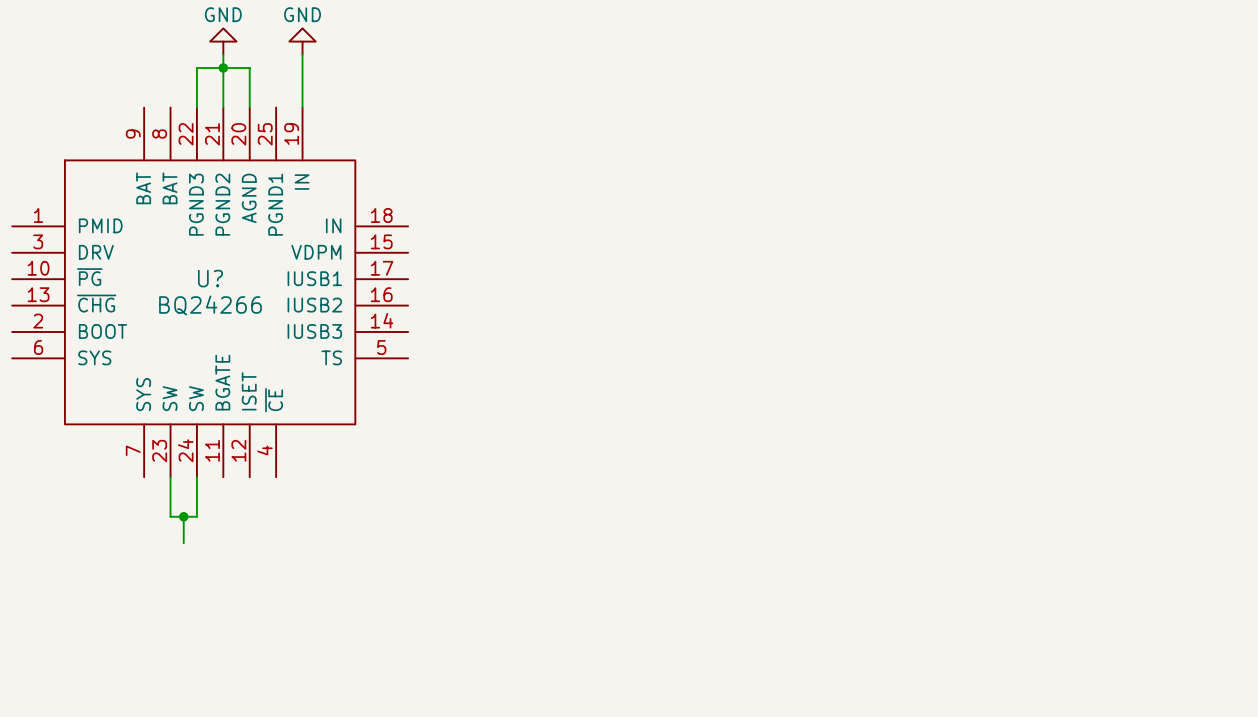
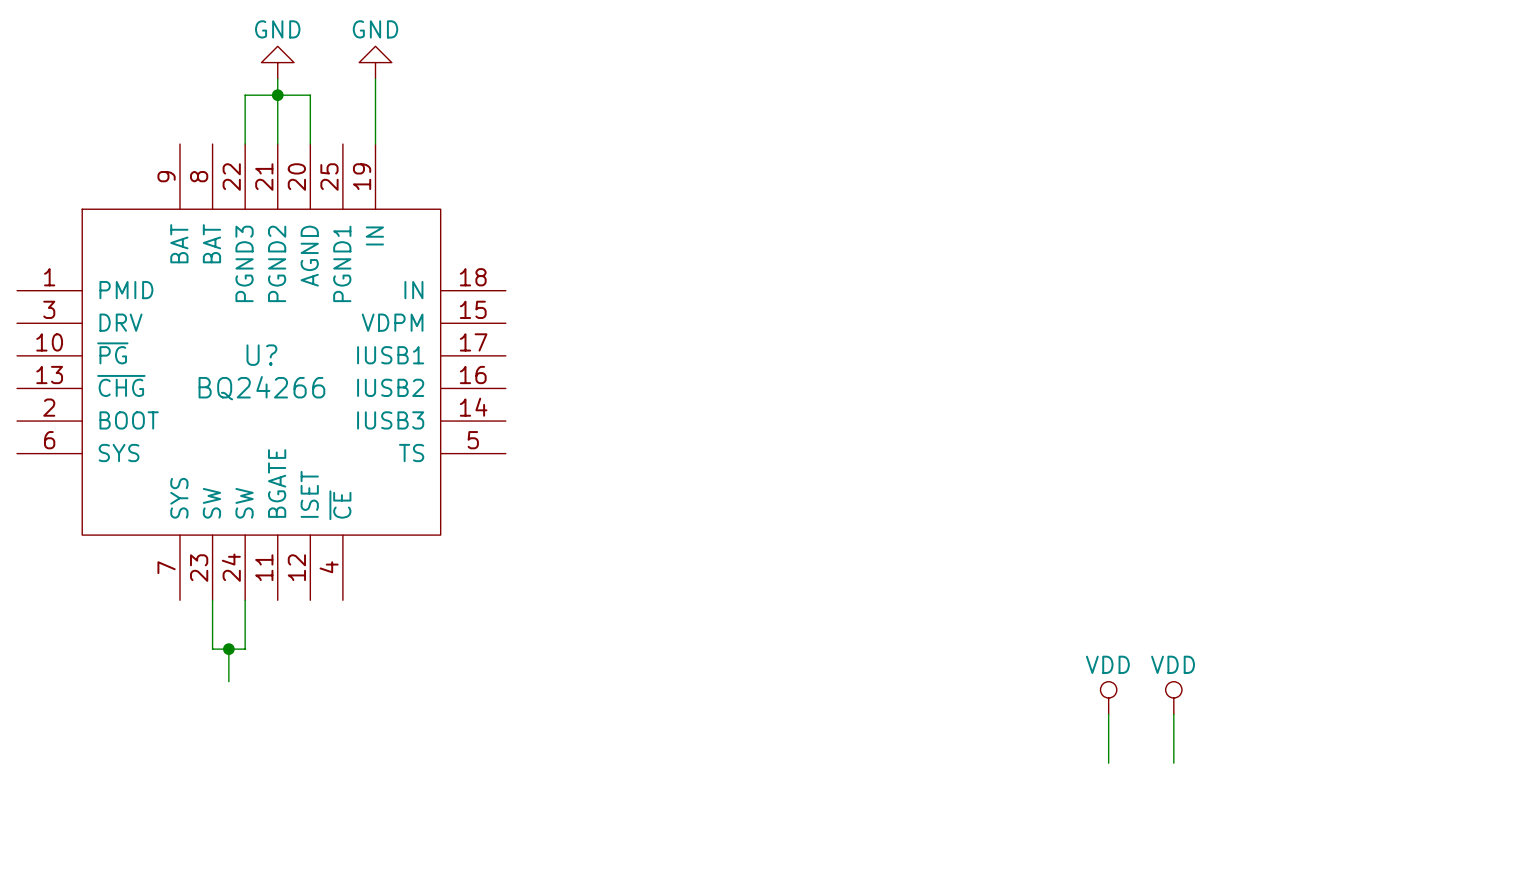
power symbol: none -> VDD (1108, 698)
power symbol: none -> VDD (1173, 698)
wire: none -> (1108, 714) (1108, 763)
wire: none -> (1173, 714) (1173, 763)

